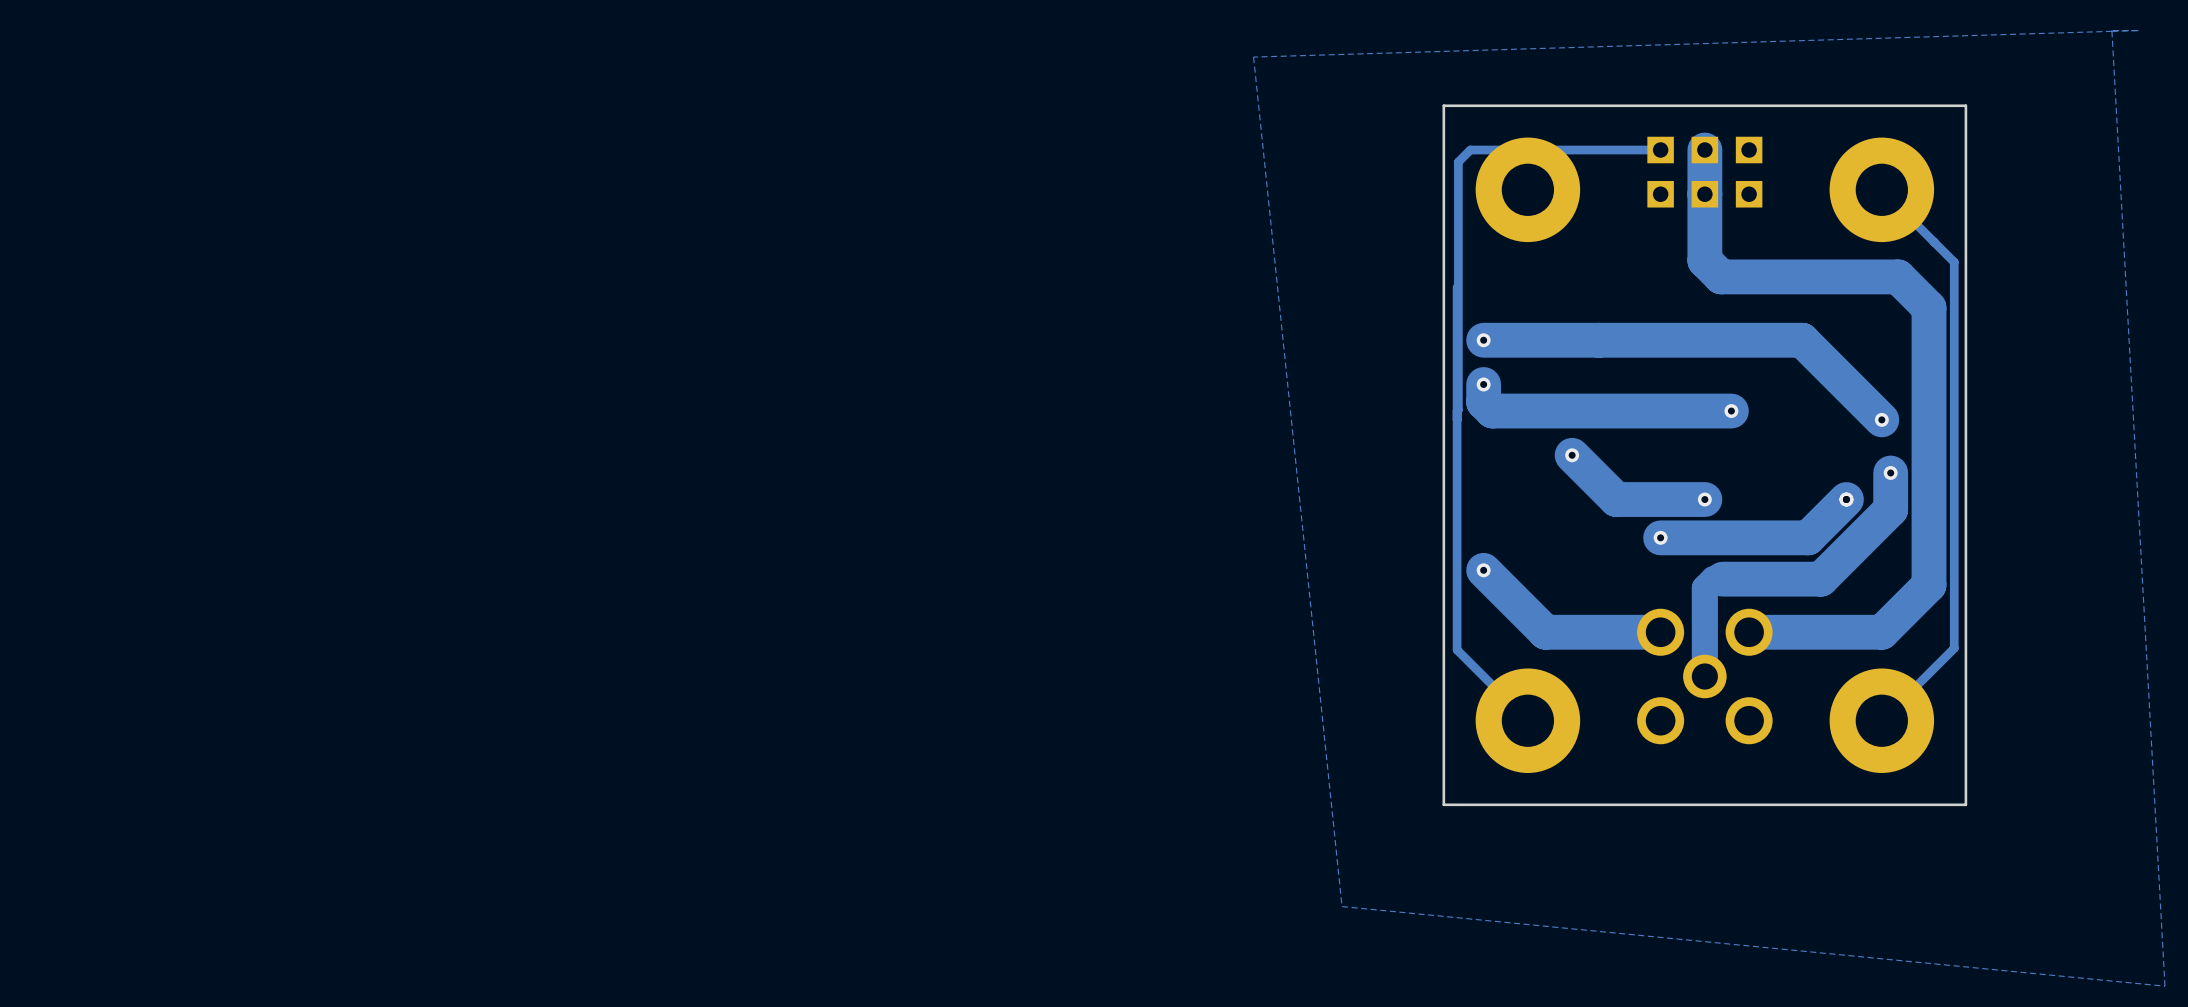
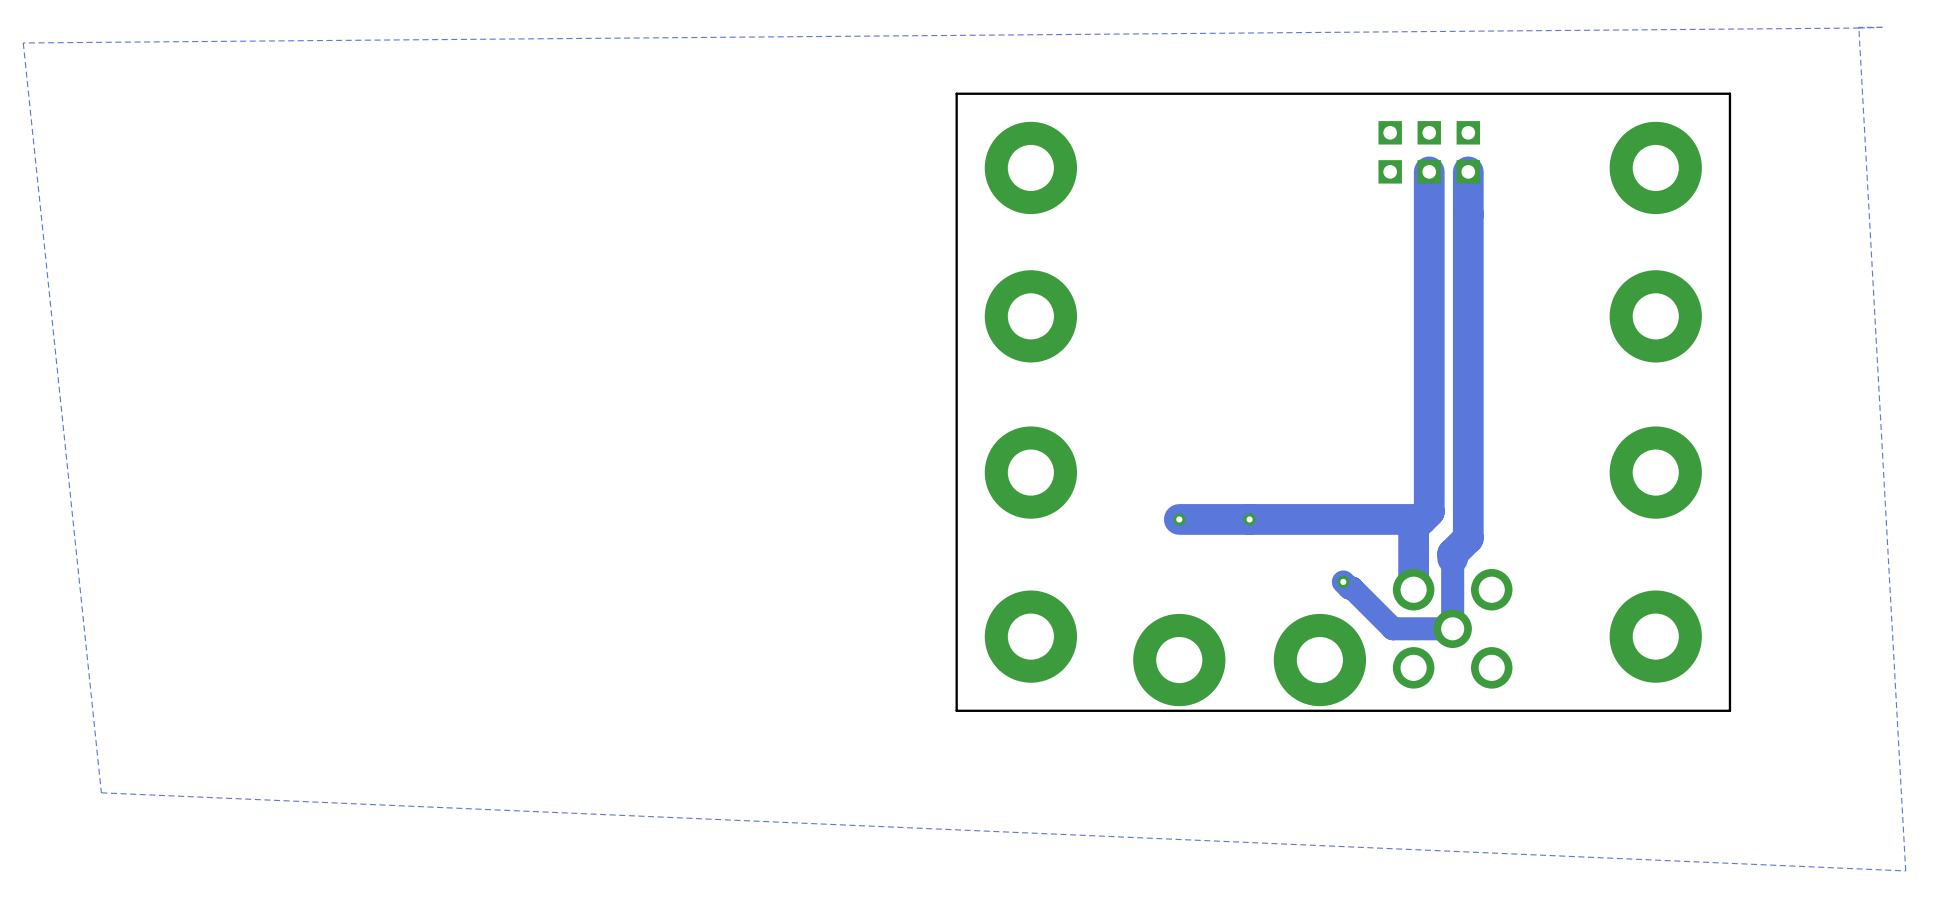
zone outline: (2111, 31) (1253, 57) (1342, 906) (2164, 986) -> (1858, 28) (23, 42) (101, 792) (1905, 870)
board edge: (1443, 105) (1443, 804) -> (1269, 93) (956, 93) (956, 710) (1269, 710)
track: (1660, 150) (1470, 150) (1458, 161) (1457, 411) -> none
track: (1704, 150) (1704, 260) (1721, 276) (1898, 276) (1929, 307) (1929, 585) (1881, 632) (1749, 632) -> none
part position: (1704, 172) -> (1429, 152)
part: none -> (1030, 167)
part: (1527, 189) -> none
track: (1881, 189) (1954, 262) (1954, 648) (1881, 720) -> none
track: none -> (1429, 171) (1429, 511) (1413, 527) (1413, 589)
track: none -> (1468, 171) (1468, 538) (1452, 553) (1452, 628) (1392, 628) (1352, 588) (1349, 588) (1343, 581)
track: (1457, 287) (1457, 649) (1527, 720) -> none
track: (1483, 340) (1802, 340) (1881, 419) -> none
via: (1483, 340) -> none
part: none -> (1030, 316)
part: none -> (1655, 316)
track: (1483, 384) (1483, 402) (1492, 411) (1731, 411) -> none
via: (1483, 384) -> none
via: (1731, 411) -> none
via: (1881, 419) -> none
track: (1572, 455) (1616, 499) (1704, 499) -> none
via: (1572, 455) -> none
track: (1890, 472) (1890, 509) (1821, 579) (1713, 579) (1704, 588) (1704, 676) -> none
via: (1890, 472) -> none
via: (1704, 499) -> none
track: (1846, 499) (1808, 537) (1660, 537) -> none
via: (1846, 499) -> none
part: none -> (1030, 472)
part: none -> (1655, 472)
via: (1660, 537) -> none
track: (1483, 570) (1545, 632) (1660, 632) -> none
via: (1483, 570) -> none
via: none -> (1179, 519)
via: none -> (1249, 519)
track: none -> (1421, 519) (1179, 519)
via: none -> (1343, 581)
part position: (1704, 676) -> (1452, 628)
part: none -> (1030, 636)
part position: (1527, 720) -> (1319, 660)
part: none -> (1179, 660)

